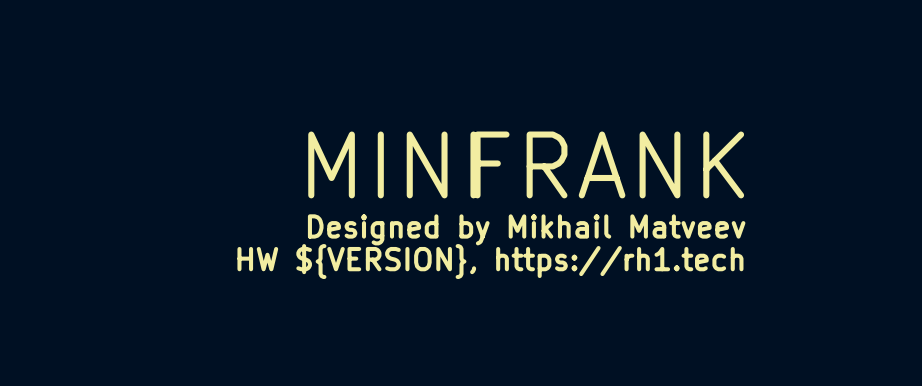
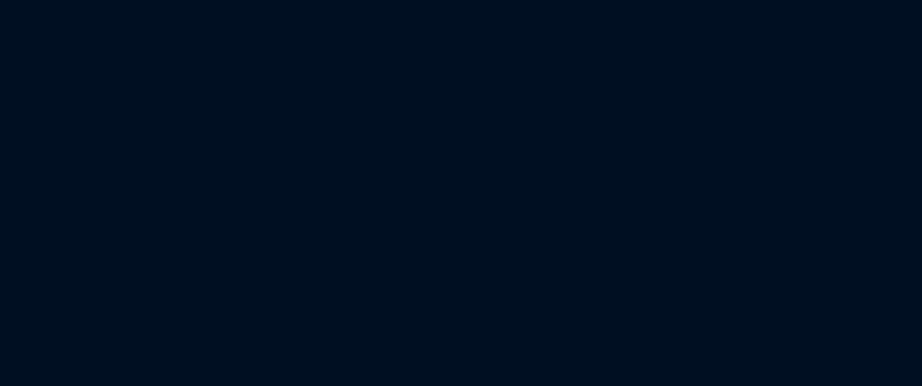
text: MINI (392, 164) -> none
text: FRANK (609, 164) -> none
text: Designed by Mikhail Matveev (526, 229) -> none
text: HW ${VERSION}, https://rh1.tech (490, 261) -> none

